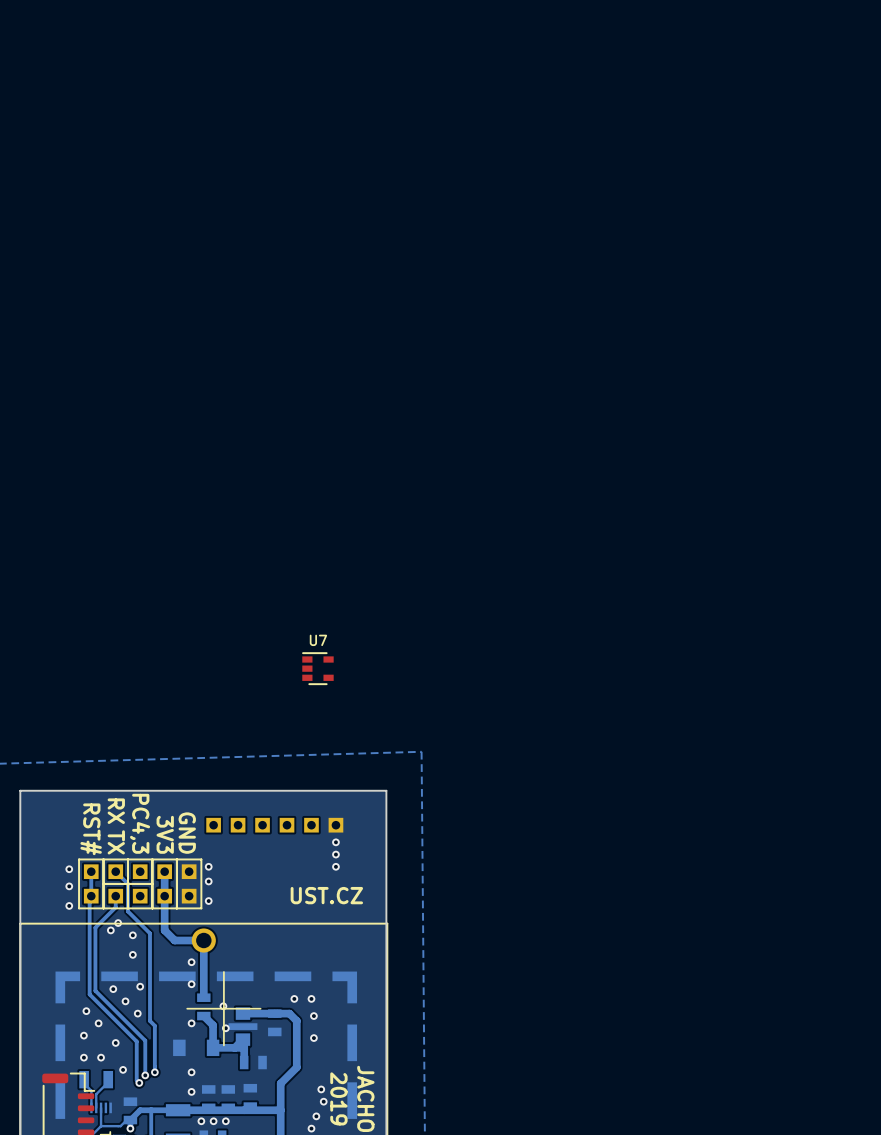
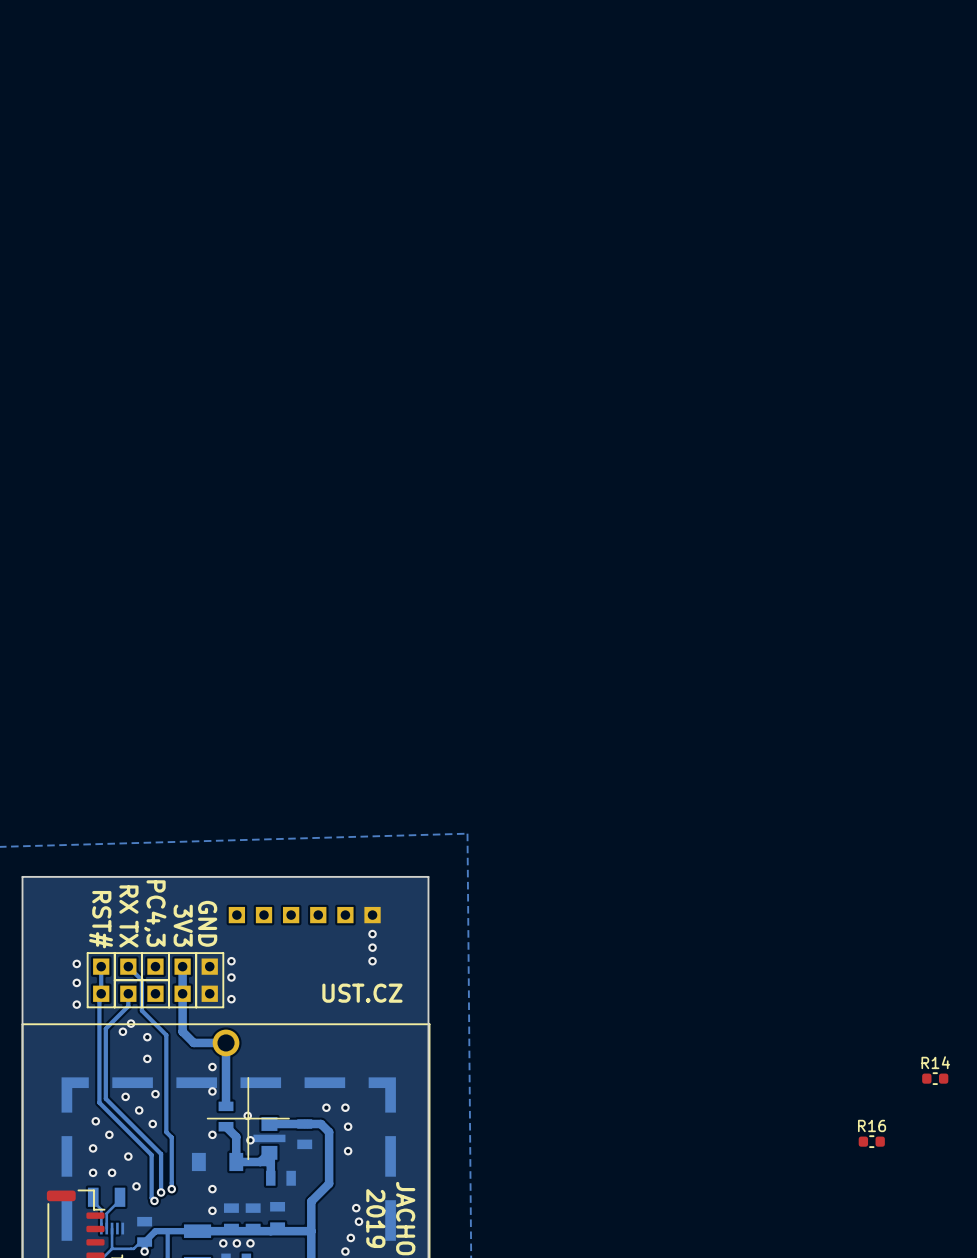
U7: (317, 668) -> none
R14: none -> (935, 1078)
R16: none -> (871, 1141)

